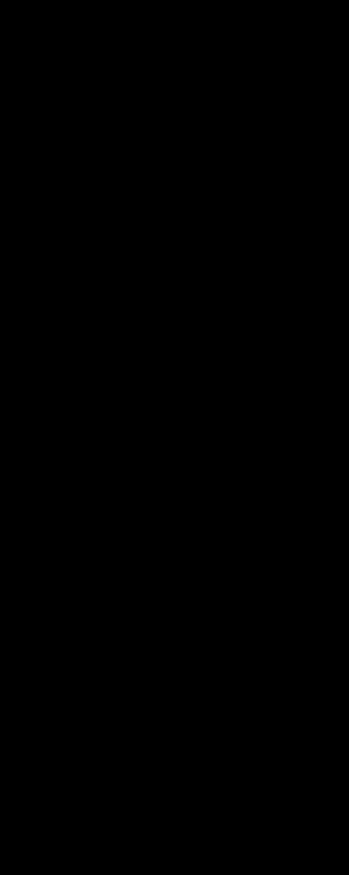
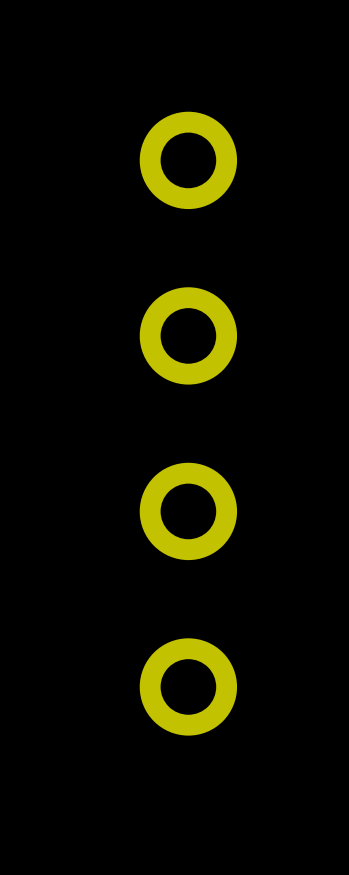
part: none -> (188, 160)
part: none -> (188, 335)
part: none -> (188, 511)
part: none -> (188, 686)

